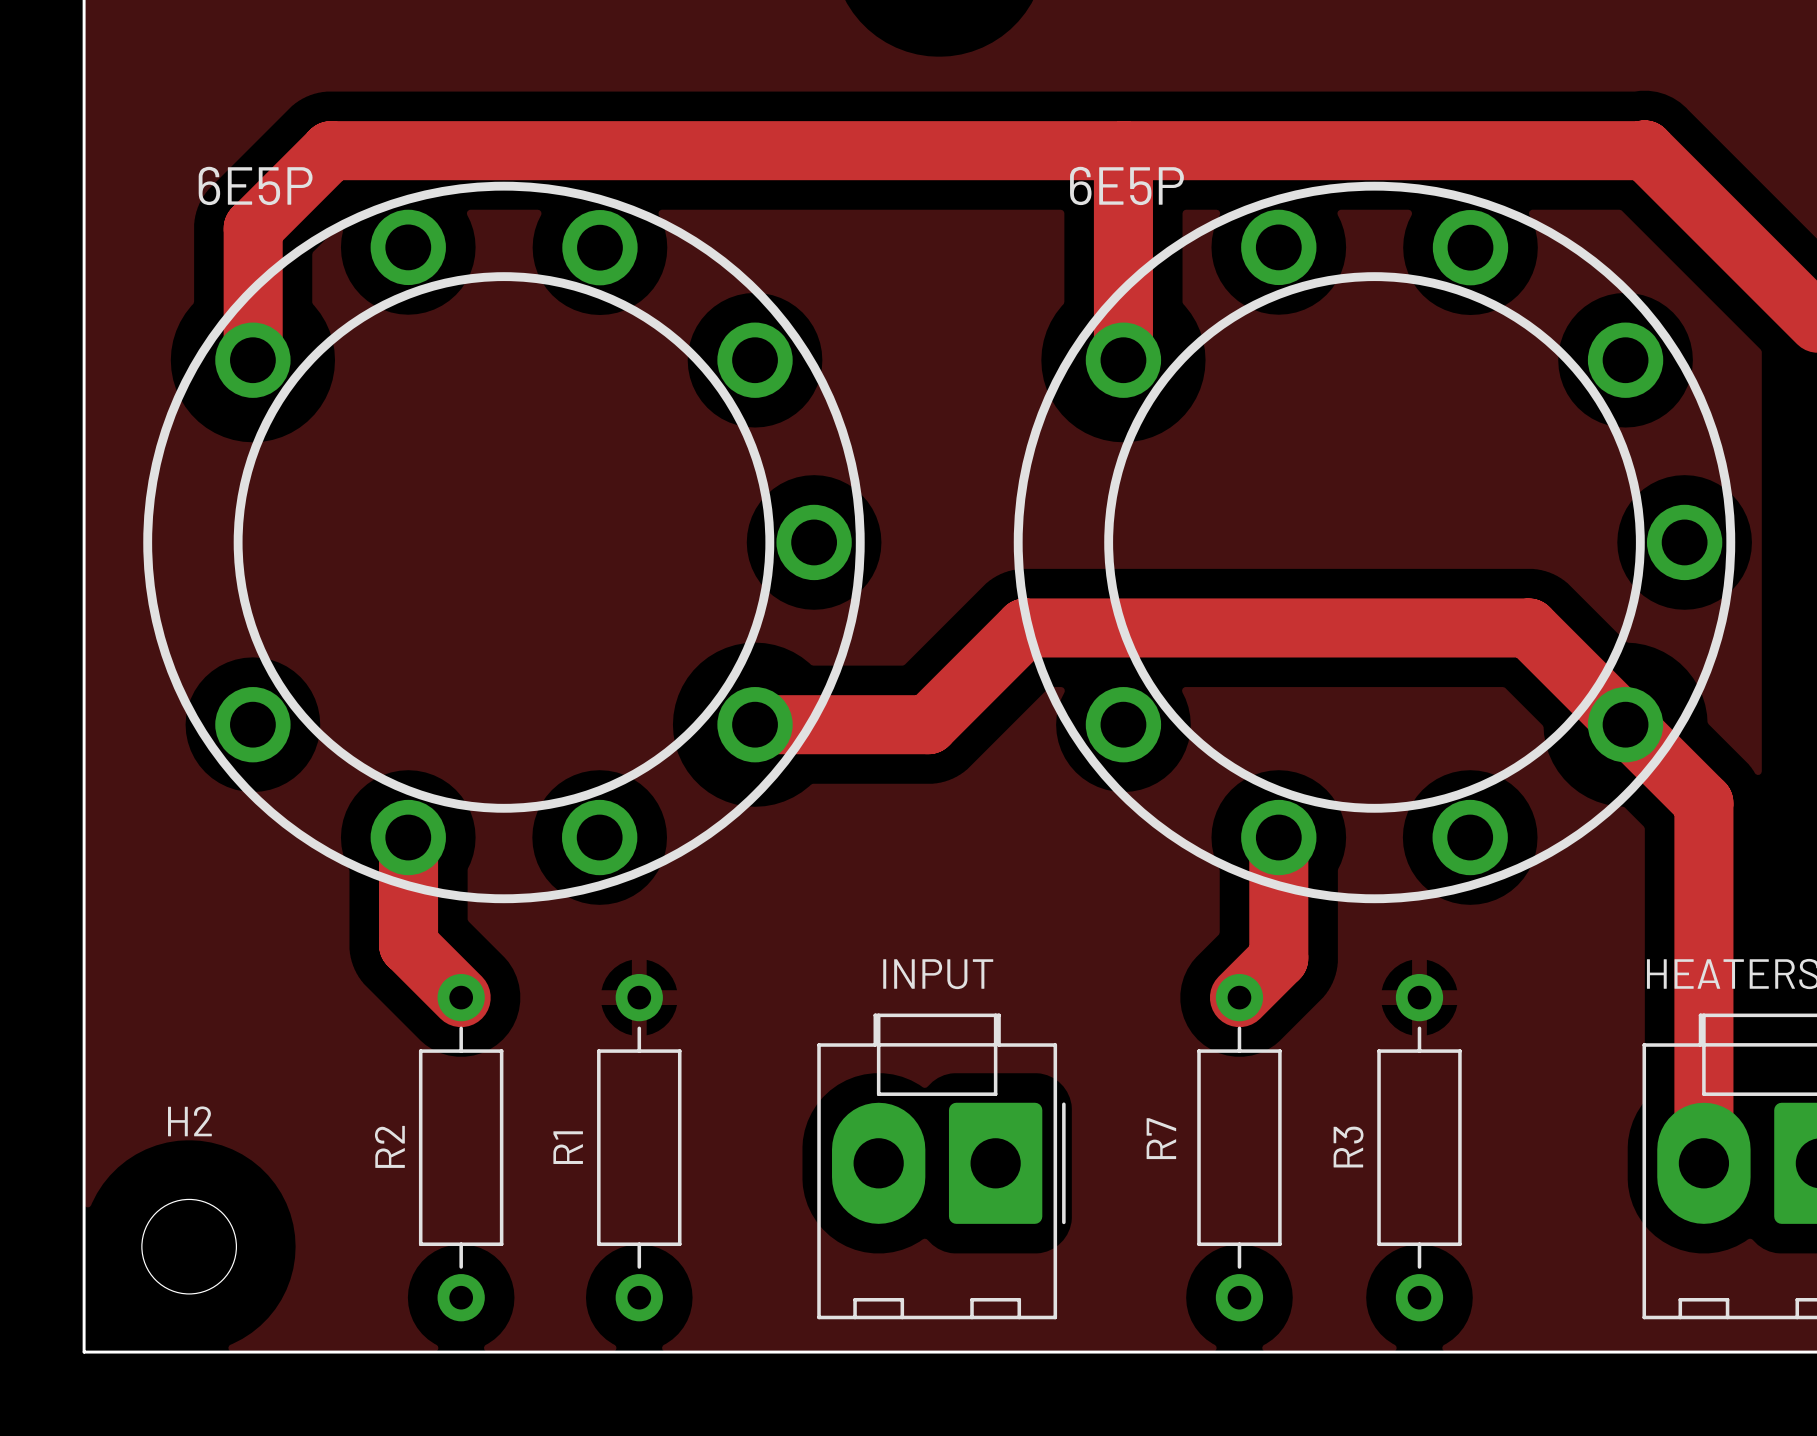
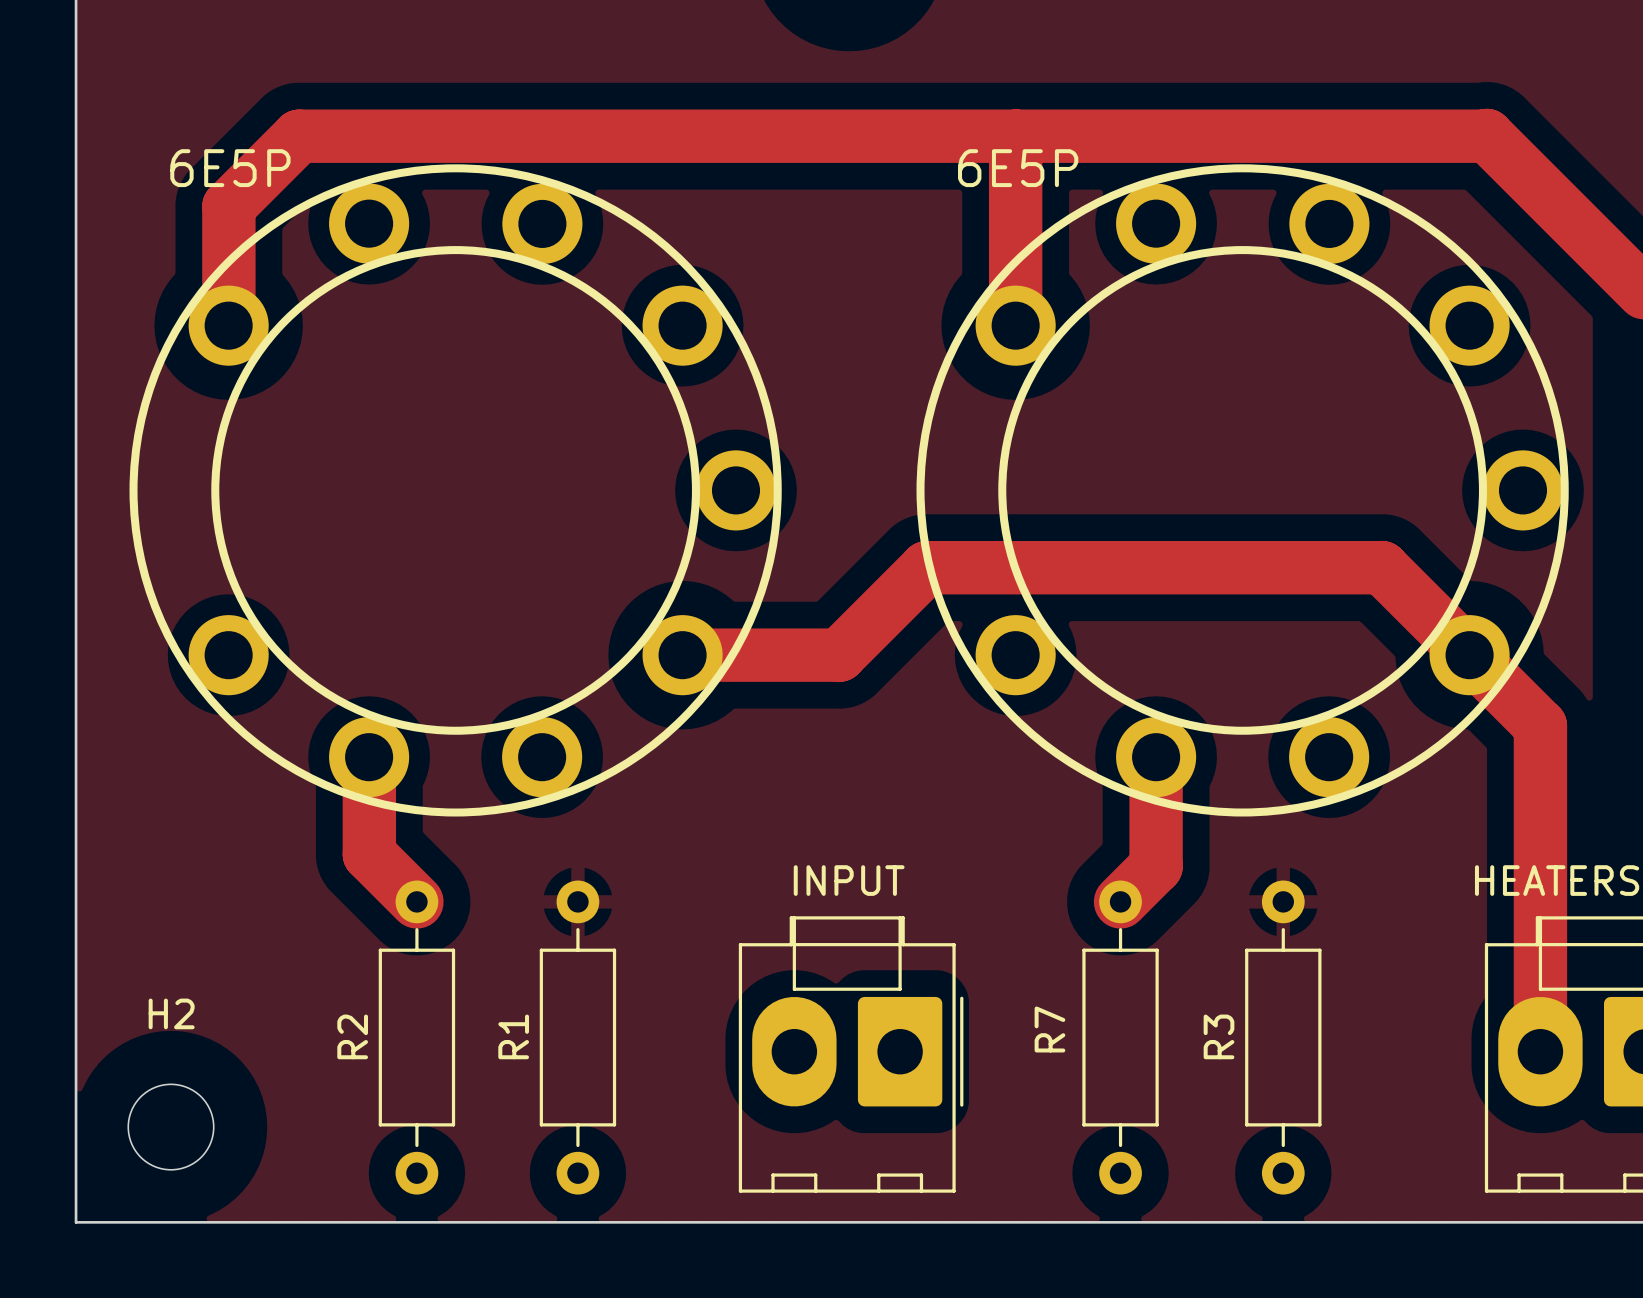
part footprint: [143, 181, 865, 904] -> [129, 164, 782, 817]
part footprint: [1013, 181, 1736, 904] -> [916, 164, 1569, 817]

